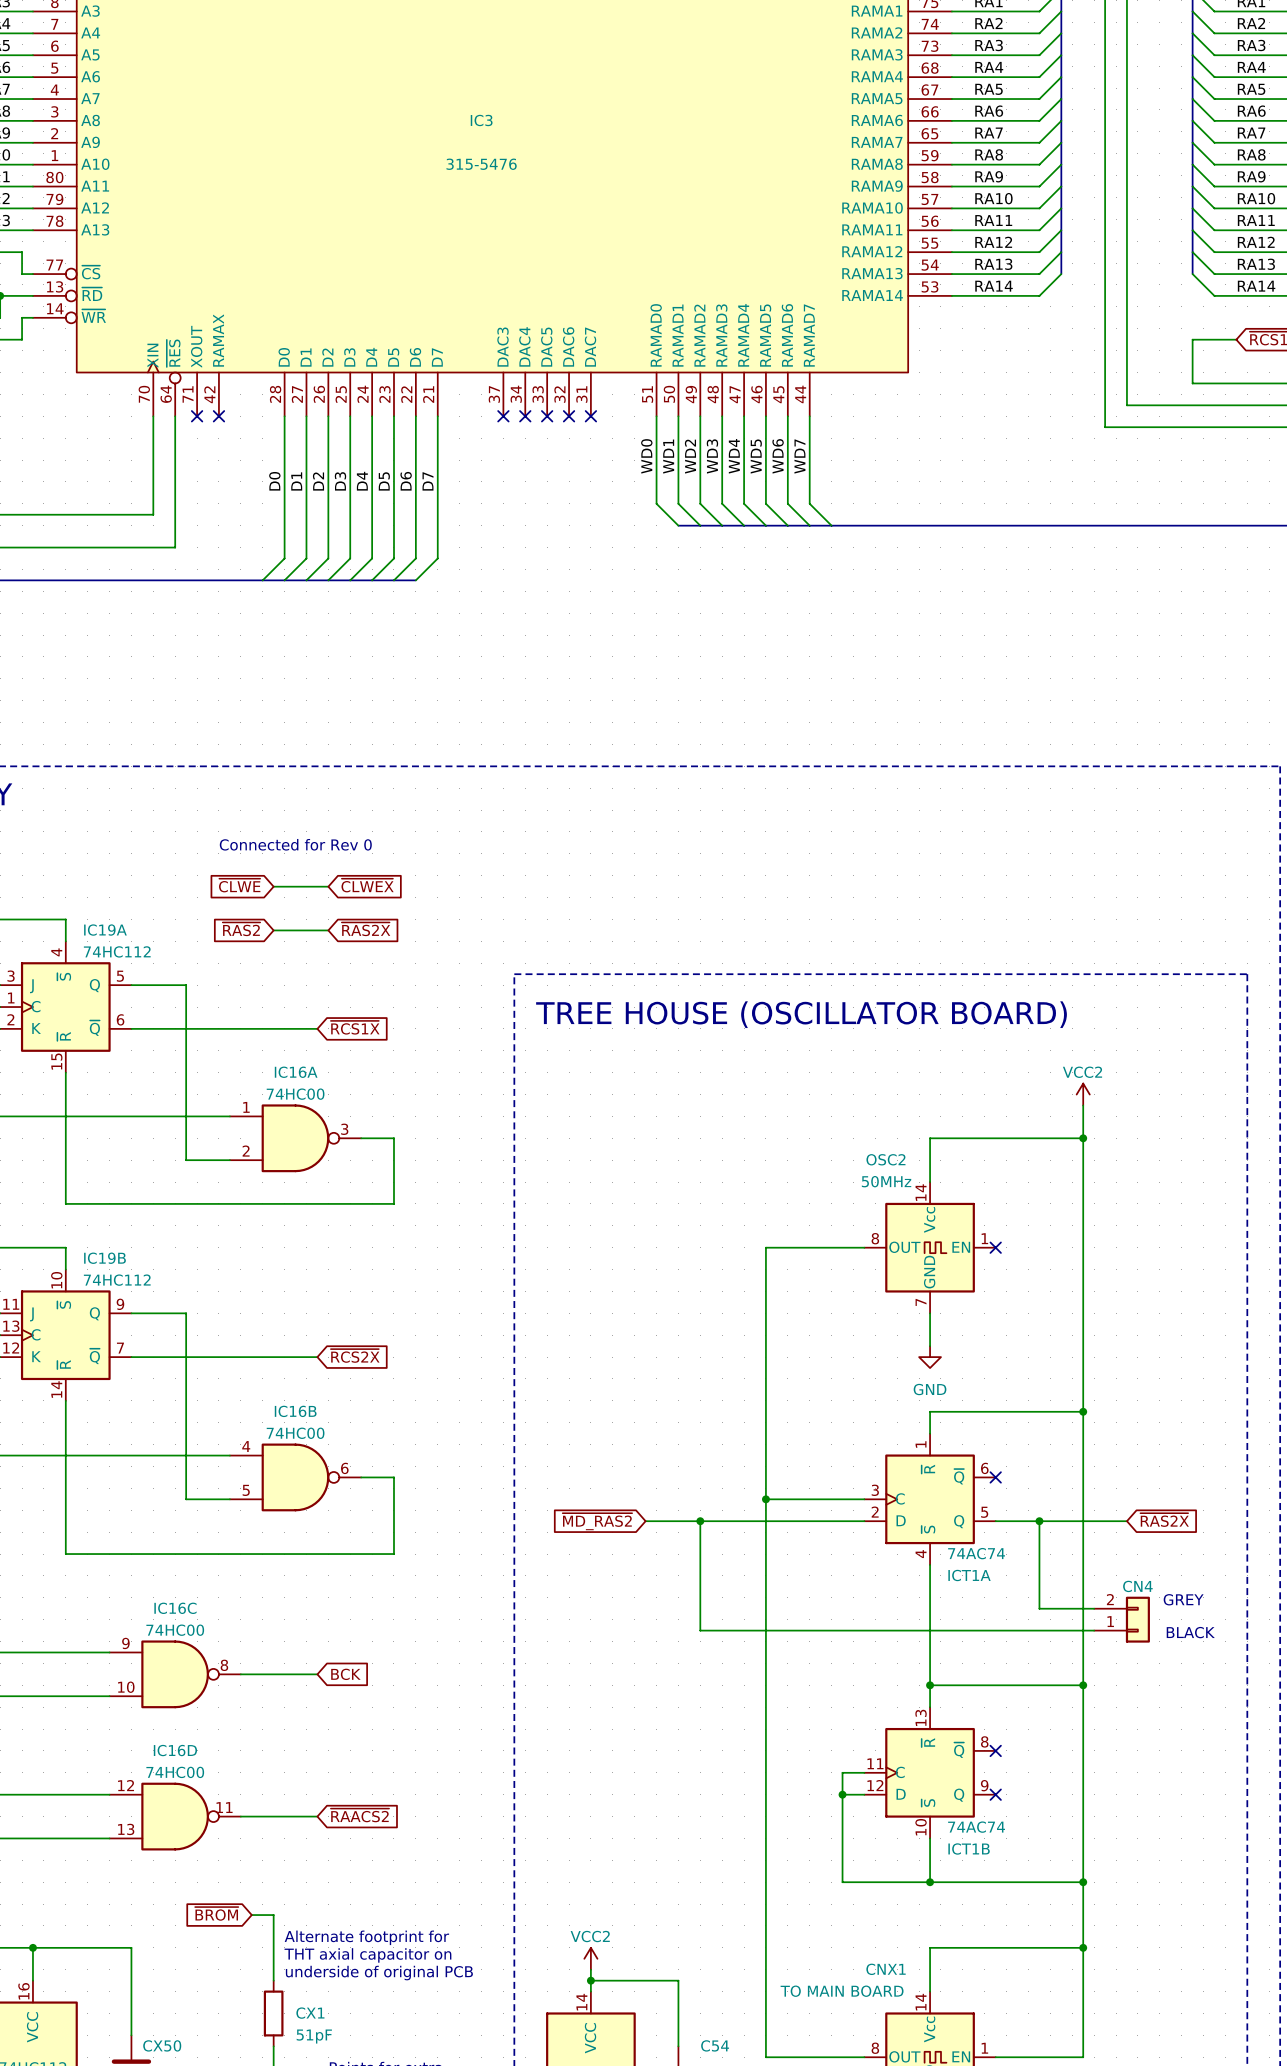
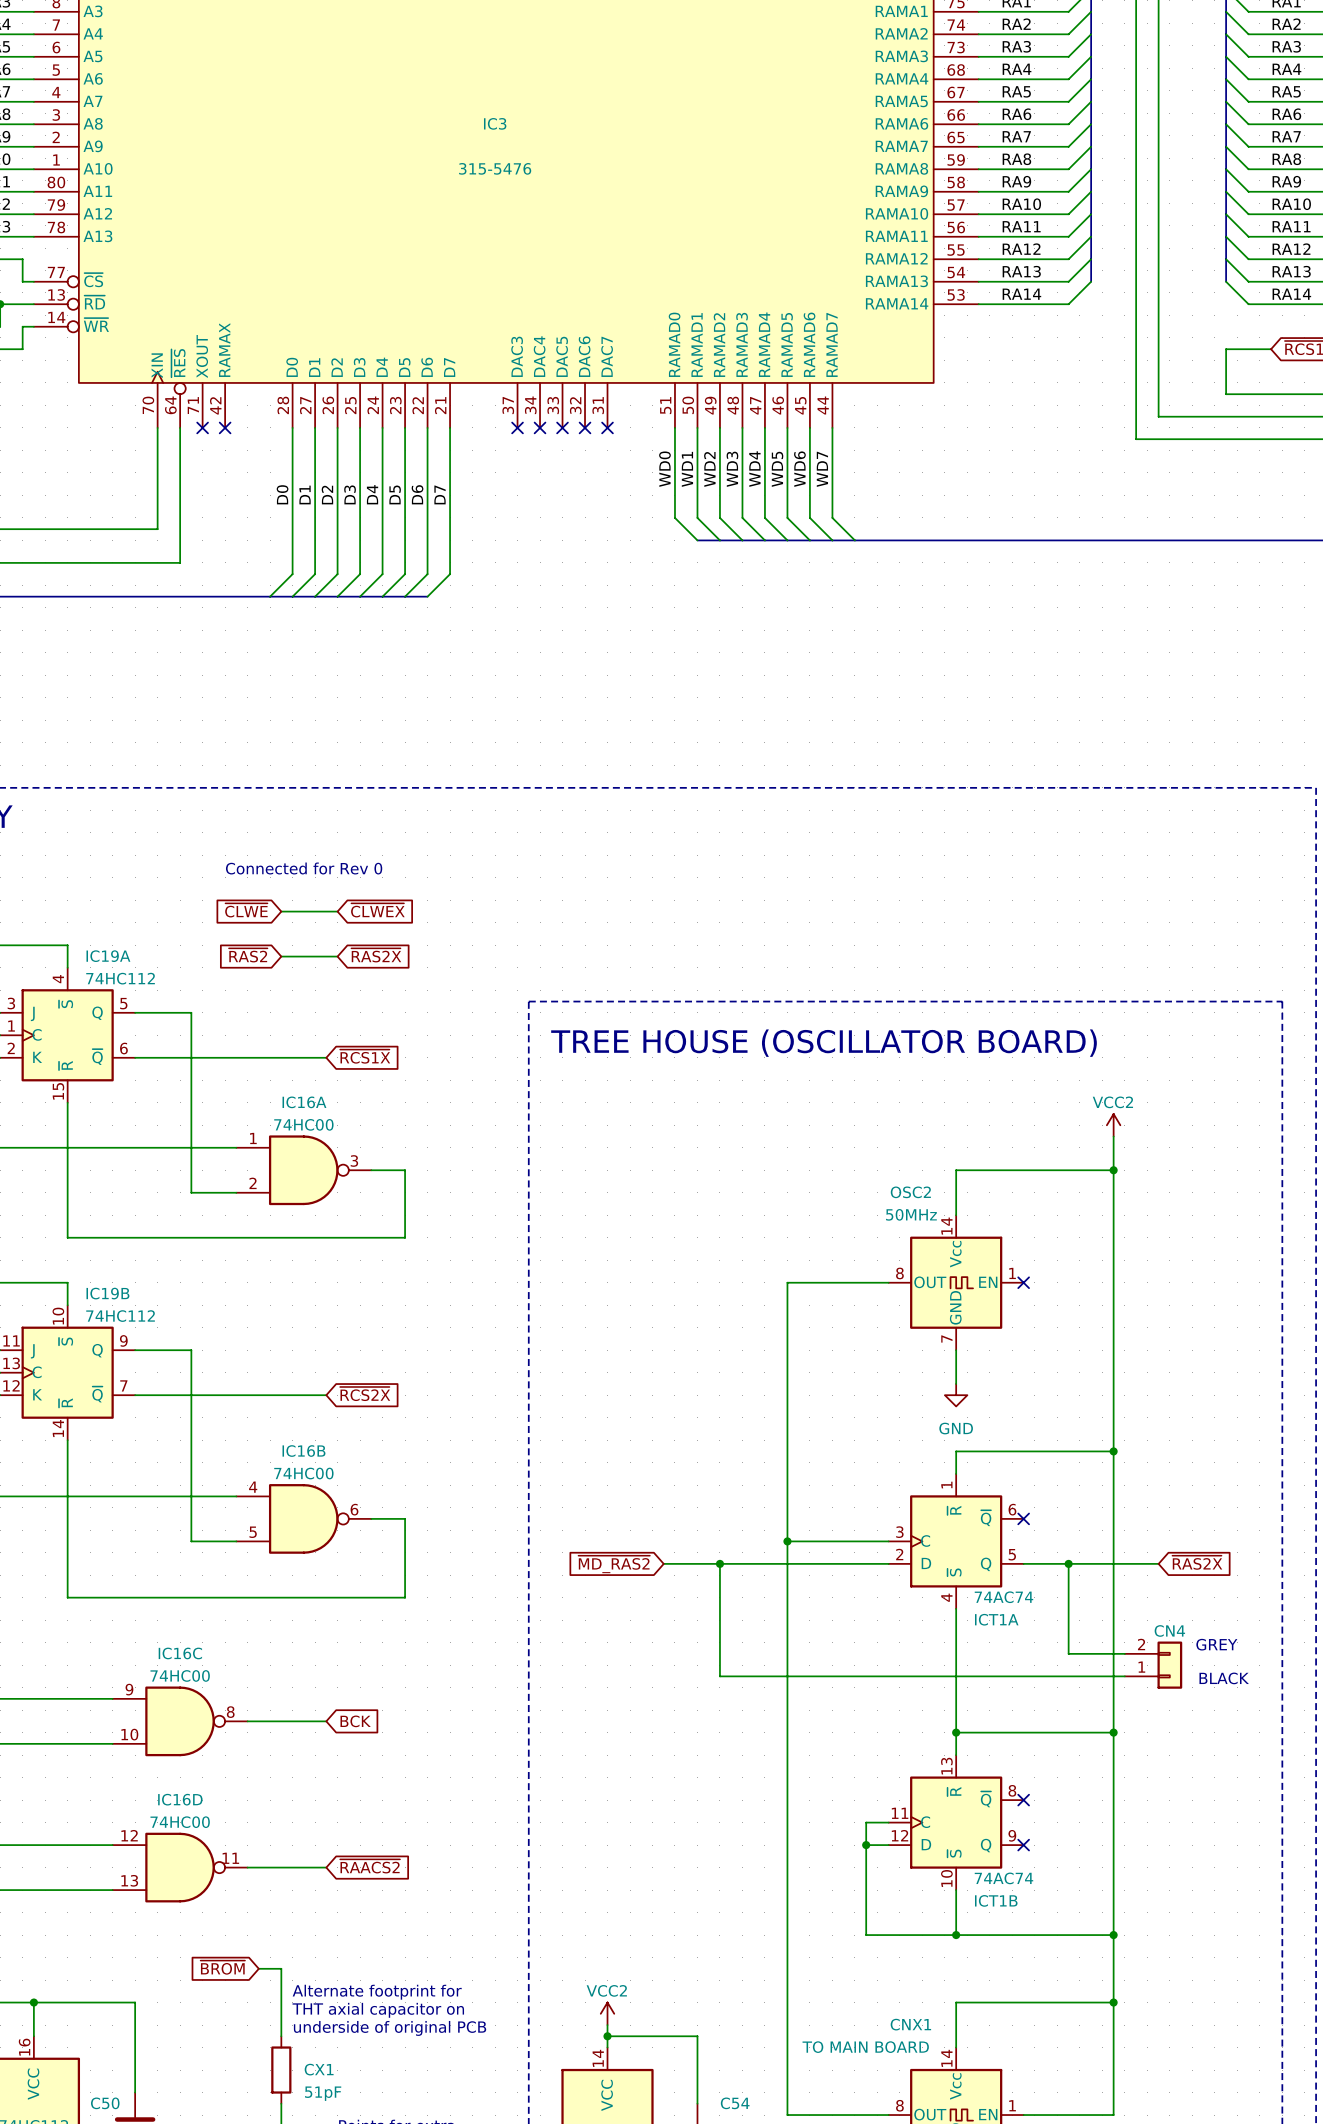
CX50 name: CX50 (162, 2045) -> C50 (105, 2103)

